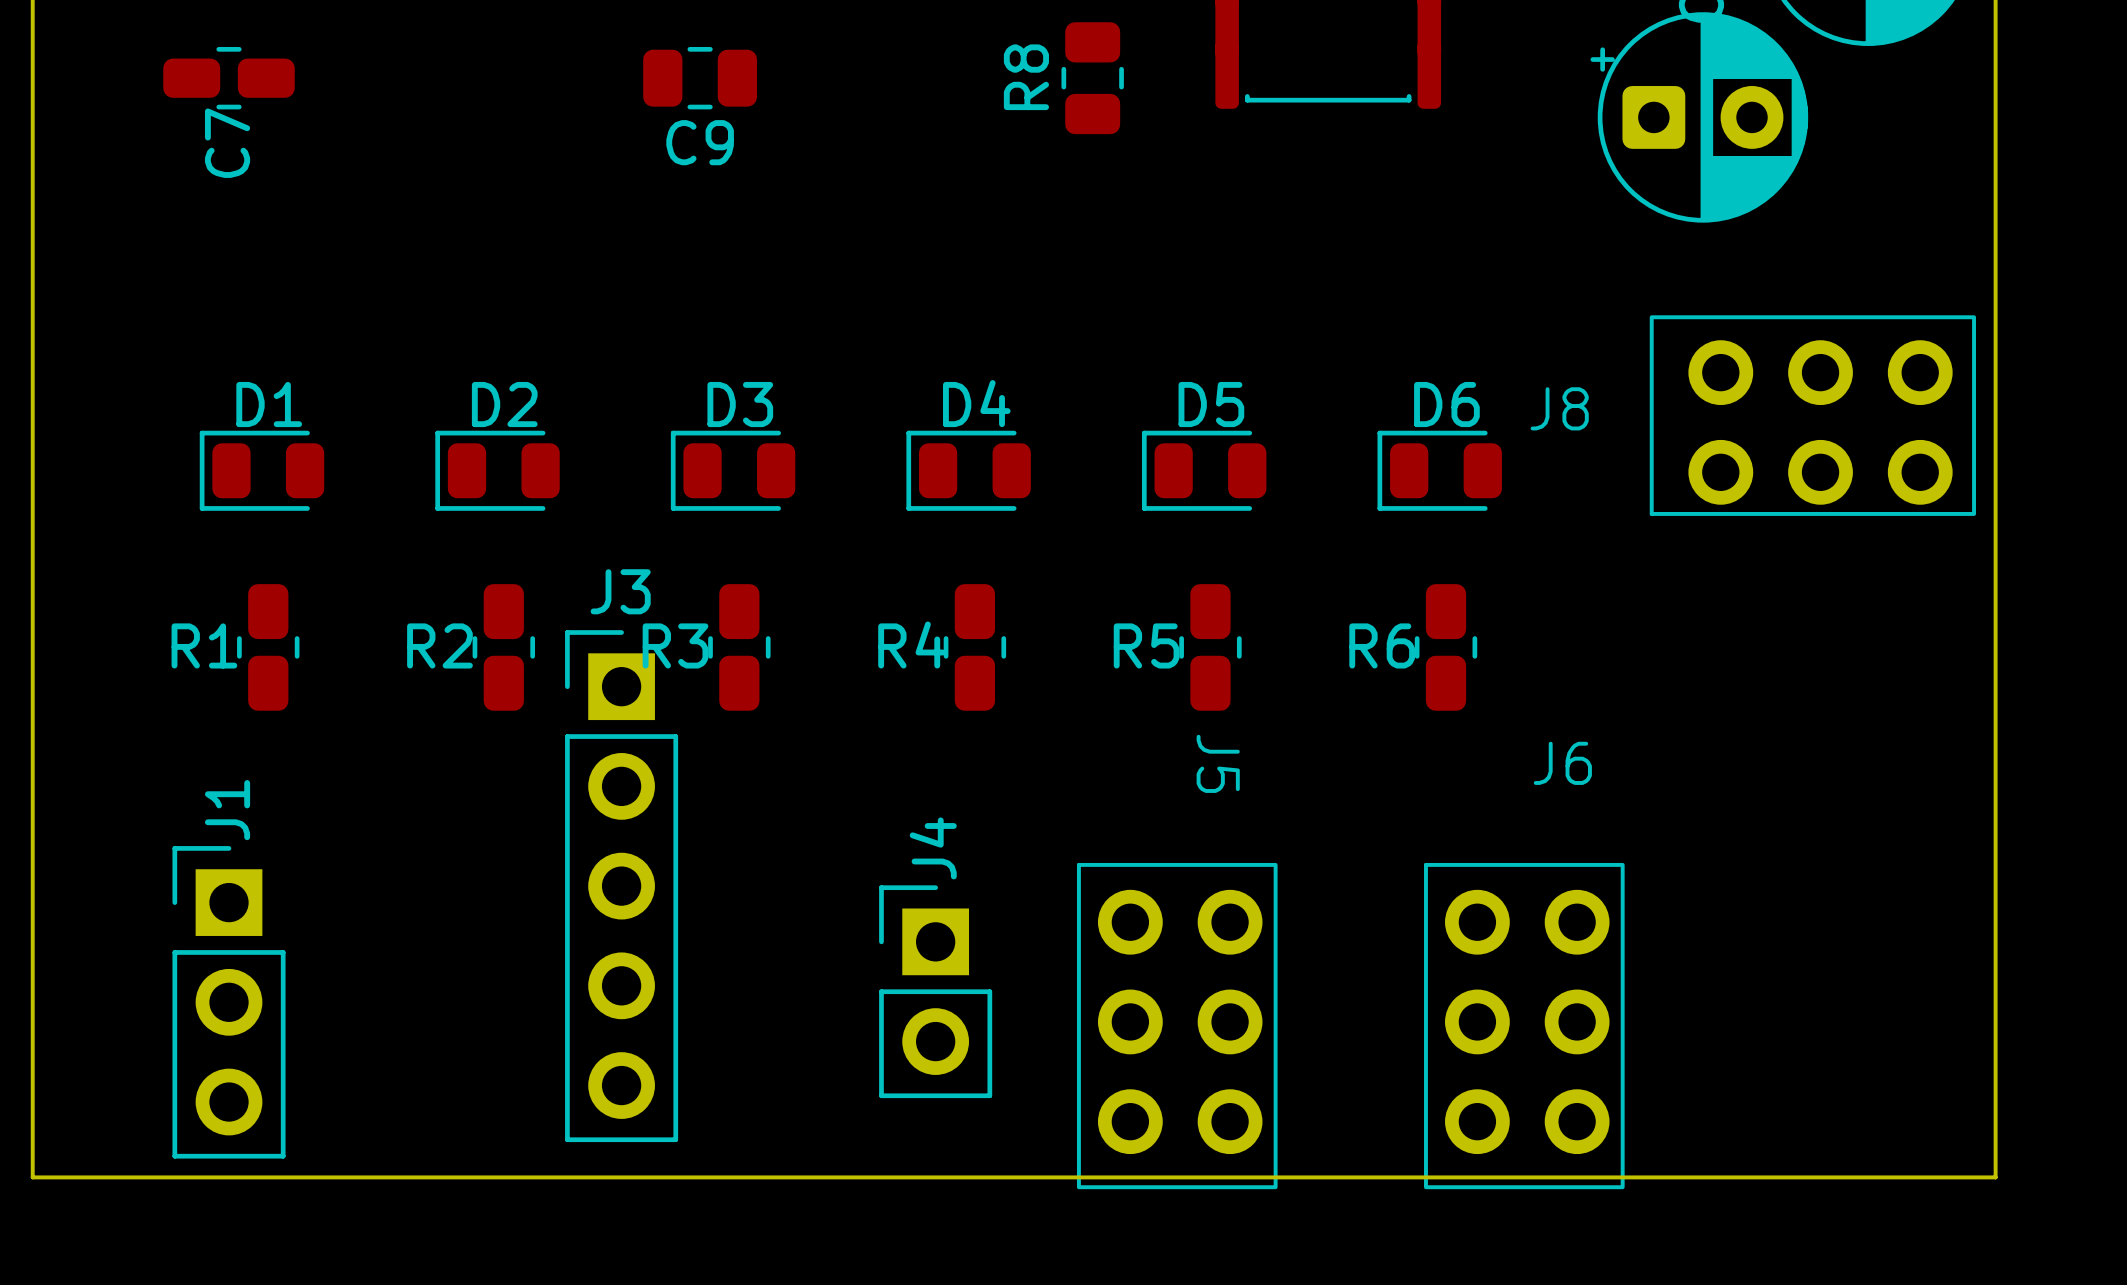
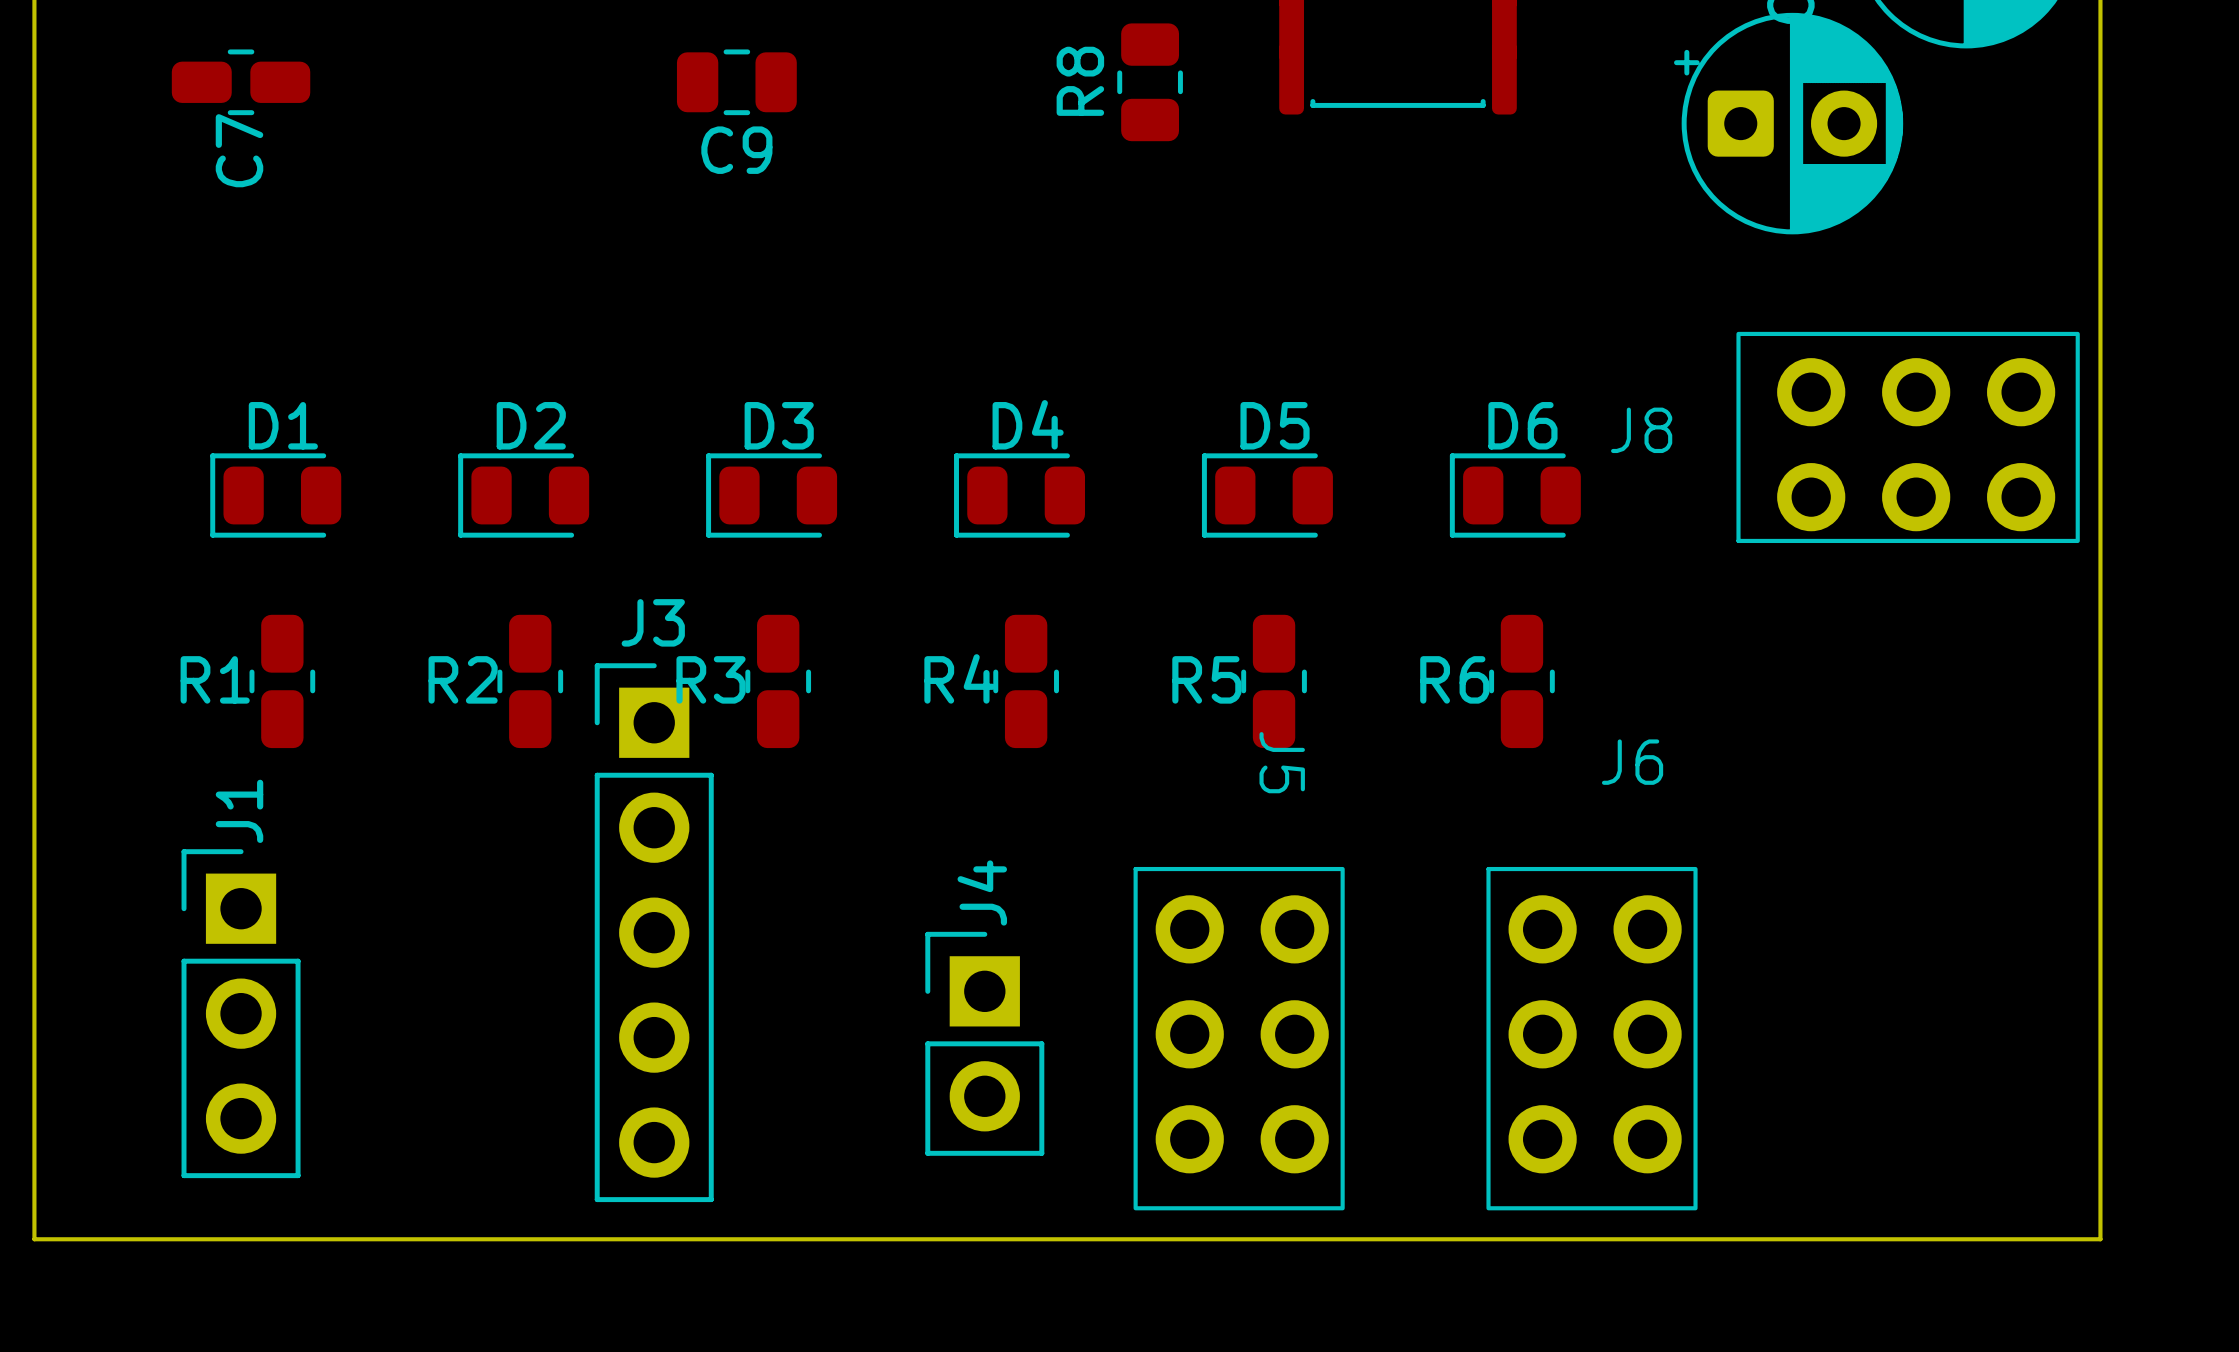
J1 position: (229, 1002) -> (241, 1013)
J5 position: (1177, 1026) -> (1239, 1038)
J6 position: (1524, 1026) -> (1592, 1038)

